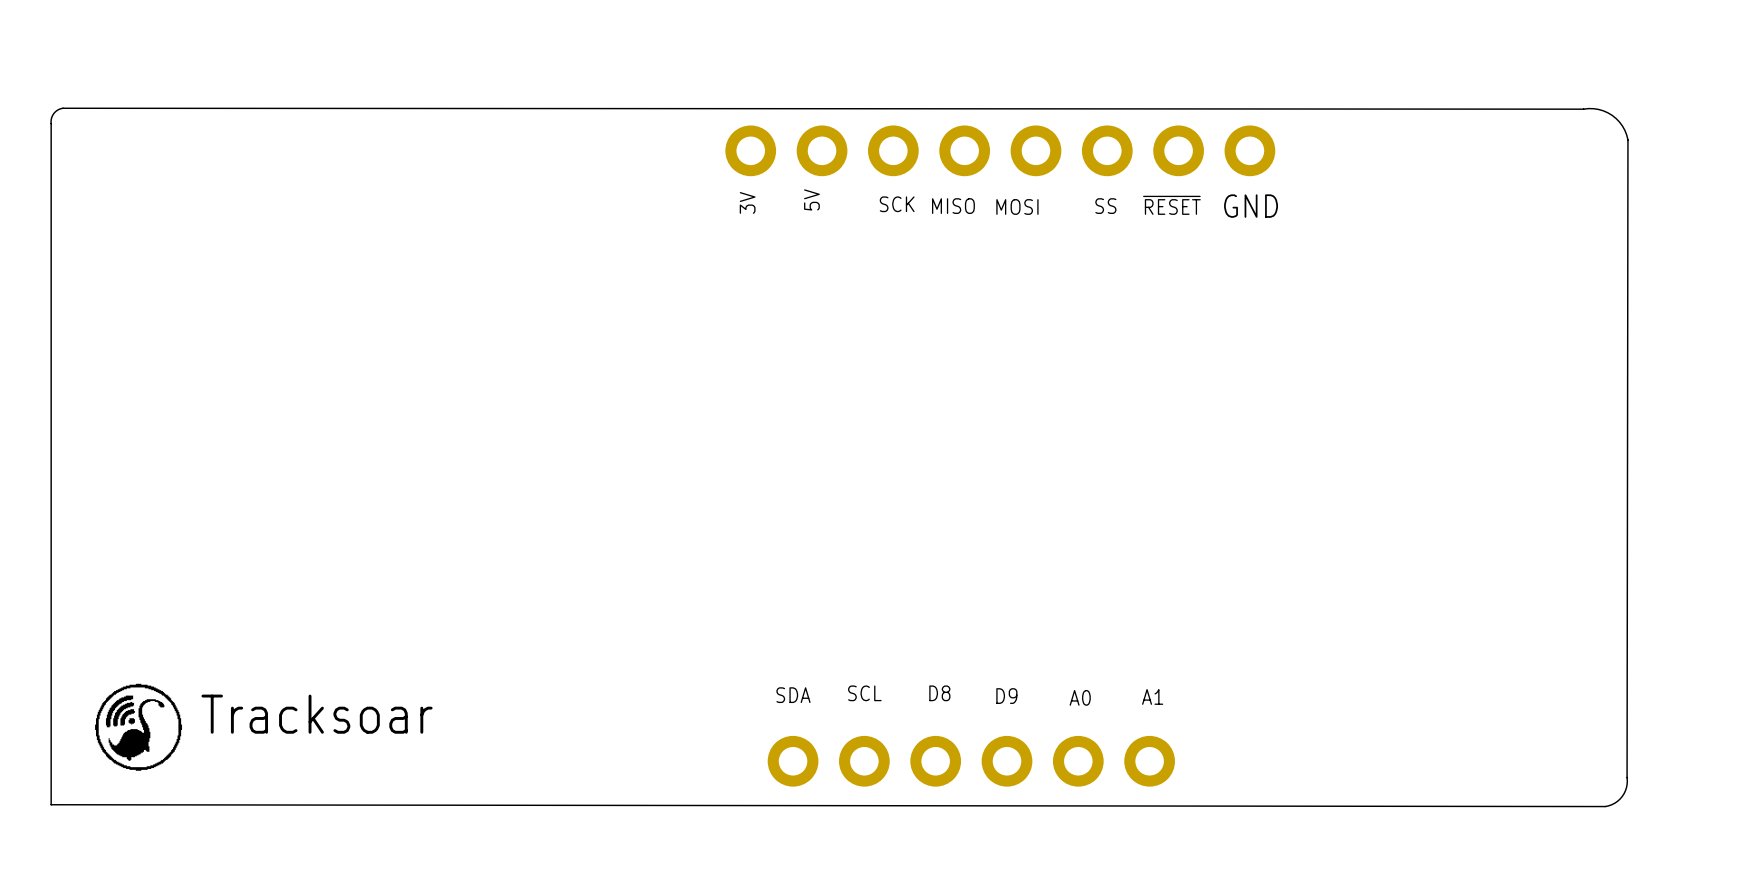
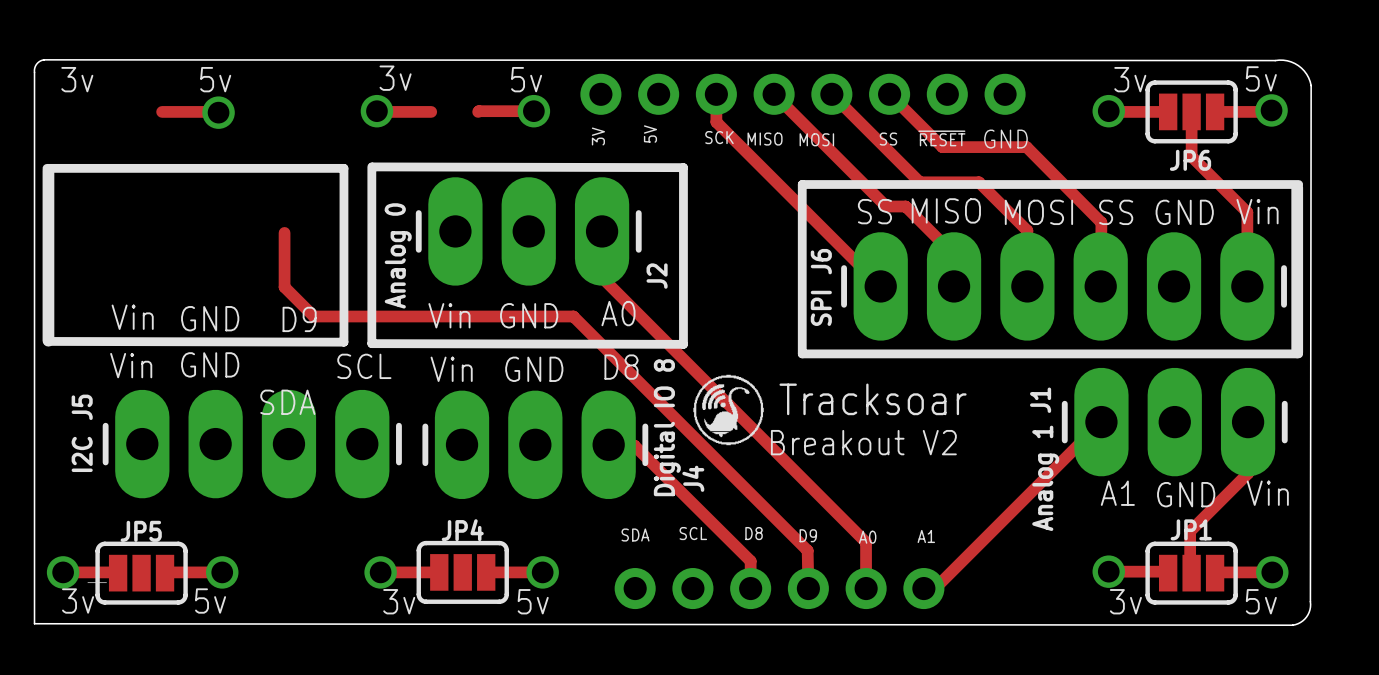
text: none -> 3v (395, 78)
text: none -> 5v (1261, 78)
text: none -> 3v (77, 79)
text: none -> 5v (215, 79)
text: none -> 5v (526, 79)
text: none -> 3v (1130, 79)
track: none -> (716, 94) (716, 122) (880, 286)
track: none -> (774, 94) (886, 206) (905, 206) (954, 254) (954, 286)
track: none -> (831, 94) (919, 182) (978, 182) (1027, 230) (1027, 286)
track: none -> (889, 94) (942, 147) (1026, 147) (1101, 222) (1100, 286)
track: none -> (1271, 110) (1215, 111)
via: none -> (1271, 110)
track: none -> (376, 111) (431, 111)
via: none -> (376, 111)
track: none -> (533, 111) (478, 111)
via: none -> (533, 111)
track: none -> (1108, 111) (1168, 111)
via: none -> (1108, 111)
track: none -> (162, 111) (218, 112)
track: none -> (1191, 111) (1191, 156) (1247, 212) (1247, 286)
JP6: none -> (1191, 111)
via: none -> (218, 112)
line: none -> (371, 166) (371, 343) (683, 344) (683, 167) (372, 166)
line: none -> (46, 168) (343, 168) (343, 342) (47, 341)
line: none -> (48, 170) (48, 340)
line: none -> (1298, 184) (802, 184) (802, 353) (1298, 353)
line: none -> (1297, 187) (1297, 352)
text: none -> MISO (946, 210)
text: none -> SS (874, 211)
text: none -> Vin (1257, 211)
text: none -> MOSI (1038, 212)
text: none -> SS (1116, 212)
text: none -> GND (1184, 212)
J2: none -> Analog 0 (528, 231)
track: none -> (602, 231) (602, 277) (866, 542) (866, 588)
track: none -> (284, 232) (284, 287) (313, 316) (573, 316) (807, 550) (808, 588)
J6: none -> SPI (1064, 286)
text: none -> A0 (618, 313)
text: none -> Vin (449, 315)
text: none -> GND (529, 315)
text: none -> Vin (132, 317)
text: none -> GND (210, 318)
text: none -> D9 (299, 319)
text: none -> Vin (131, 365)
text: none -> GND (210, 364)
text: none -> SCL (364, 366)
text: none -> D8 (621, 367)
text: none -> Vin (451, 369)
text: none -> GND (534, 369)
drawing: none -> [693, 374, 764, 446]
text: none -> SDA (287, 402)
track: none -> (1101, 422) (934, 588) (923, 588)
J1: none -> Analog 1 (1174, 422)
track: none -> (1248, 422) (1248, 473) (1190, 531) (1191, 573)
text: none -> Breakout V2 (863, 442)
J5: none -> I2C (252, 444)
J4: none -> Digital IO 8 (535, 444)
track: none -> (608, 444) (634, 445) (750, 561) (750, 588)
text: none -> A1 (1117, 493)
text: none -> Vin (1267, 493)
text: none -> GND (1186, 494)
drawing: [95, 683, 183, 771] -> none
text position: Tracksoar (317, 714) -> Tracksoar (873, 399)
track: none -> (1108, 571) (1168, 573)
via: none -> (1108, 571)
track: none -> (63, 572) (118, 573)
via: none -> (63, 572)
track: none -> (222, 572) (165, 573)
via: none -> (222, 572)
track: none -> (380, 572) (439, 572)
via: none -> (380, 572)
JP4: none -> (462, 572)
track: none -> (486, 572) (542, 572)
via: none -> (542, 572)
track: none -> (1272, 572) (1215, 573)
via: none -> (1272, 572)
JP5: none -> (141, 573)
JP1: none -> (1191, 573)
drawing position: (128, 754) -> (720, 432)
text: none -> 3v (78, 601)
text: none -> 5v (210, 601)
text: none -> 3v (399, 601)
text: none -> 5v (533, 601)
text: none -> 3v (1125, 601)
text: none -> 5v (1261, 601)

